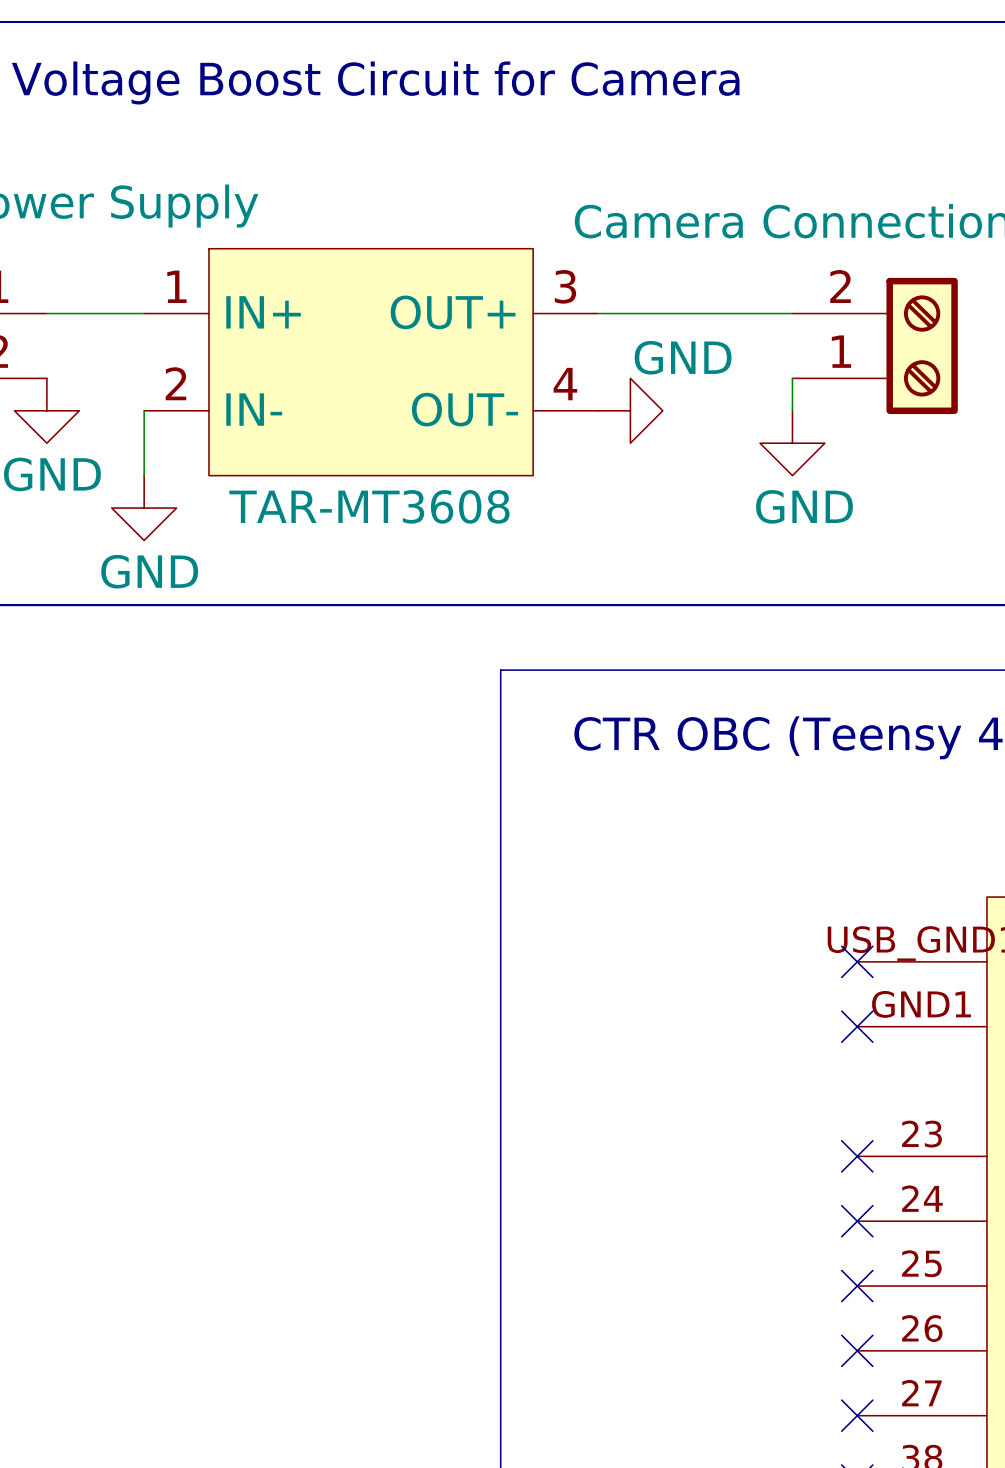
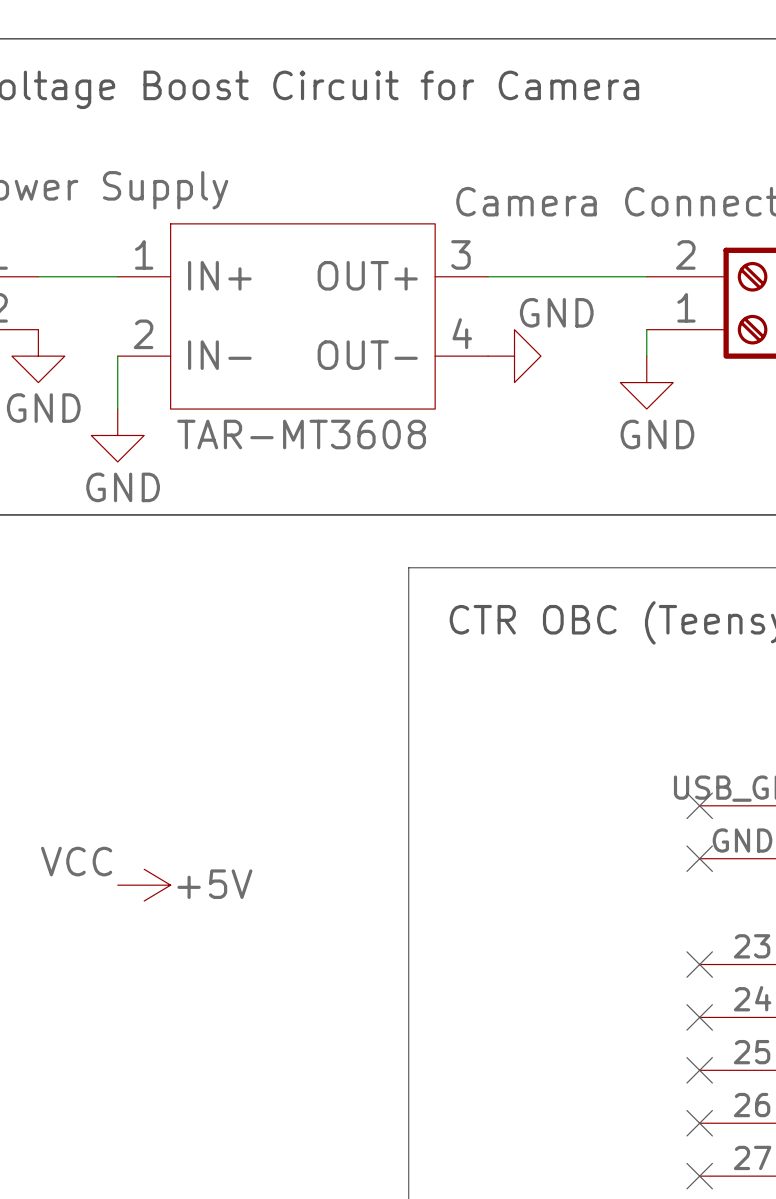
label: none -> VCC (76, 861)
power symbol: none -> +5V (144, 885)

